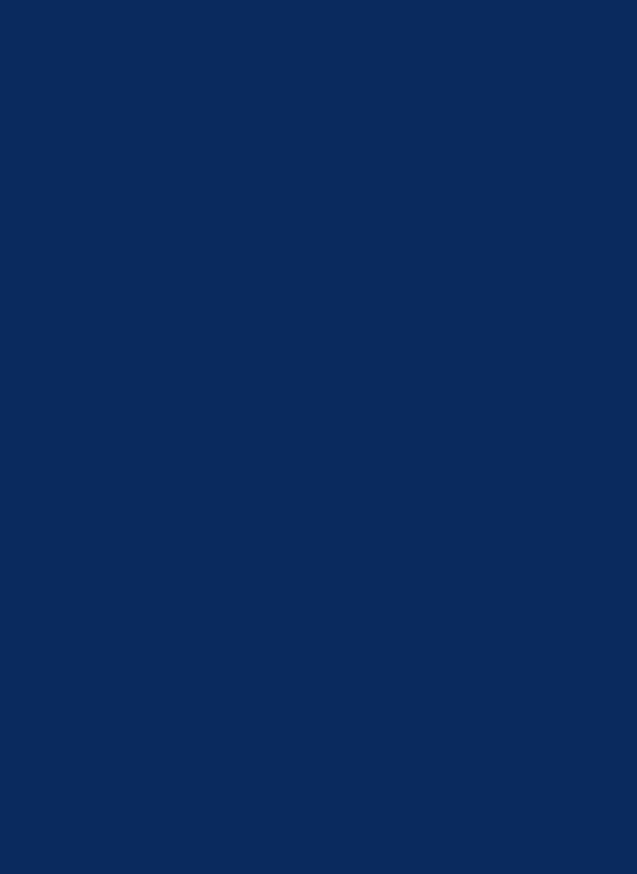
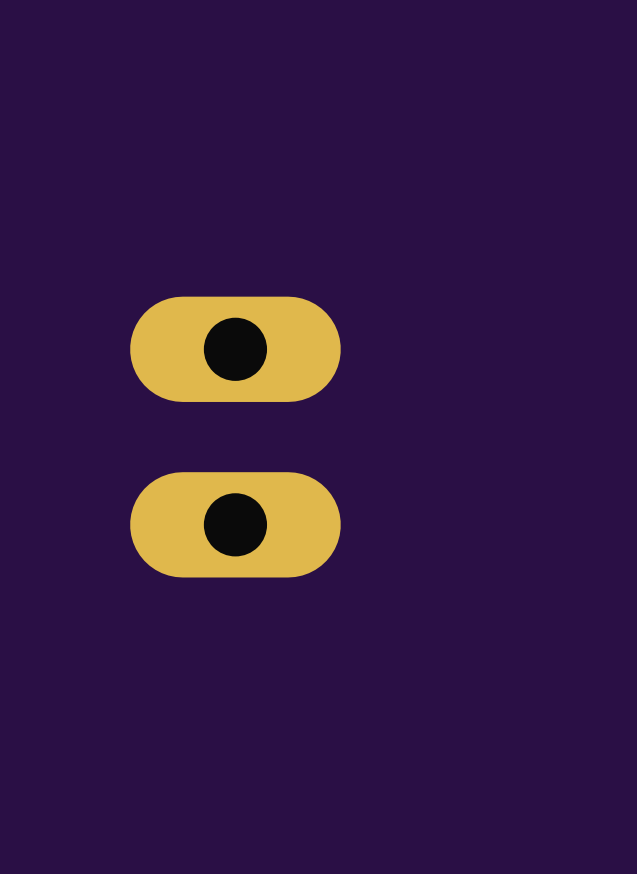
part: none -> (235, 437)

